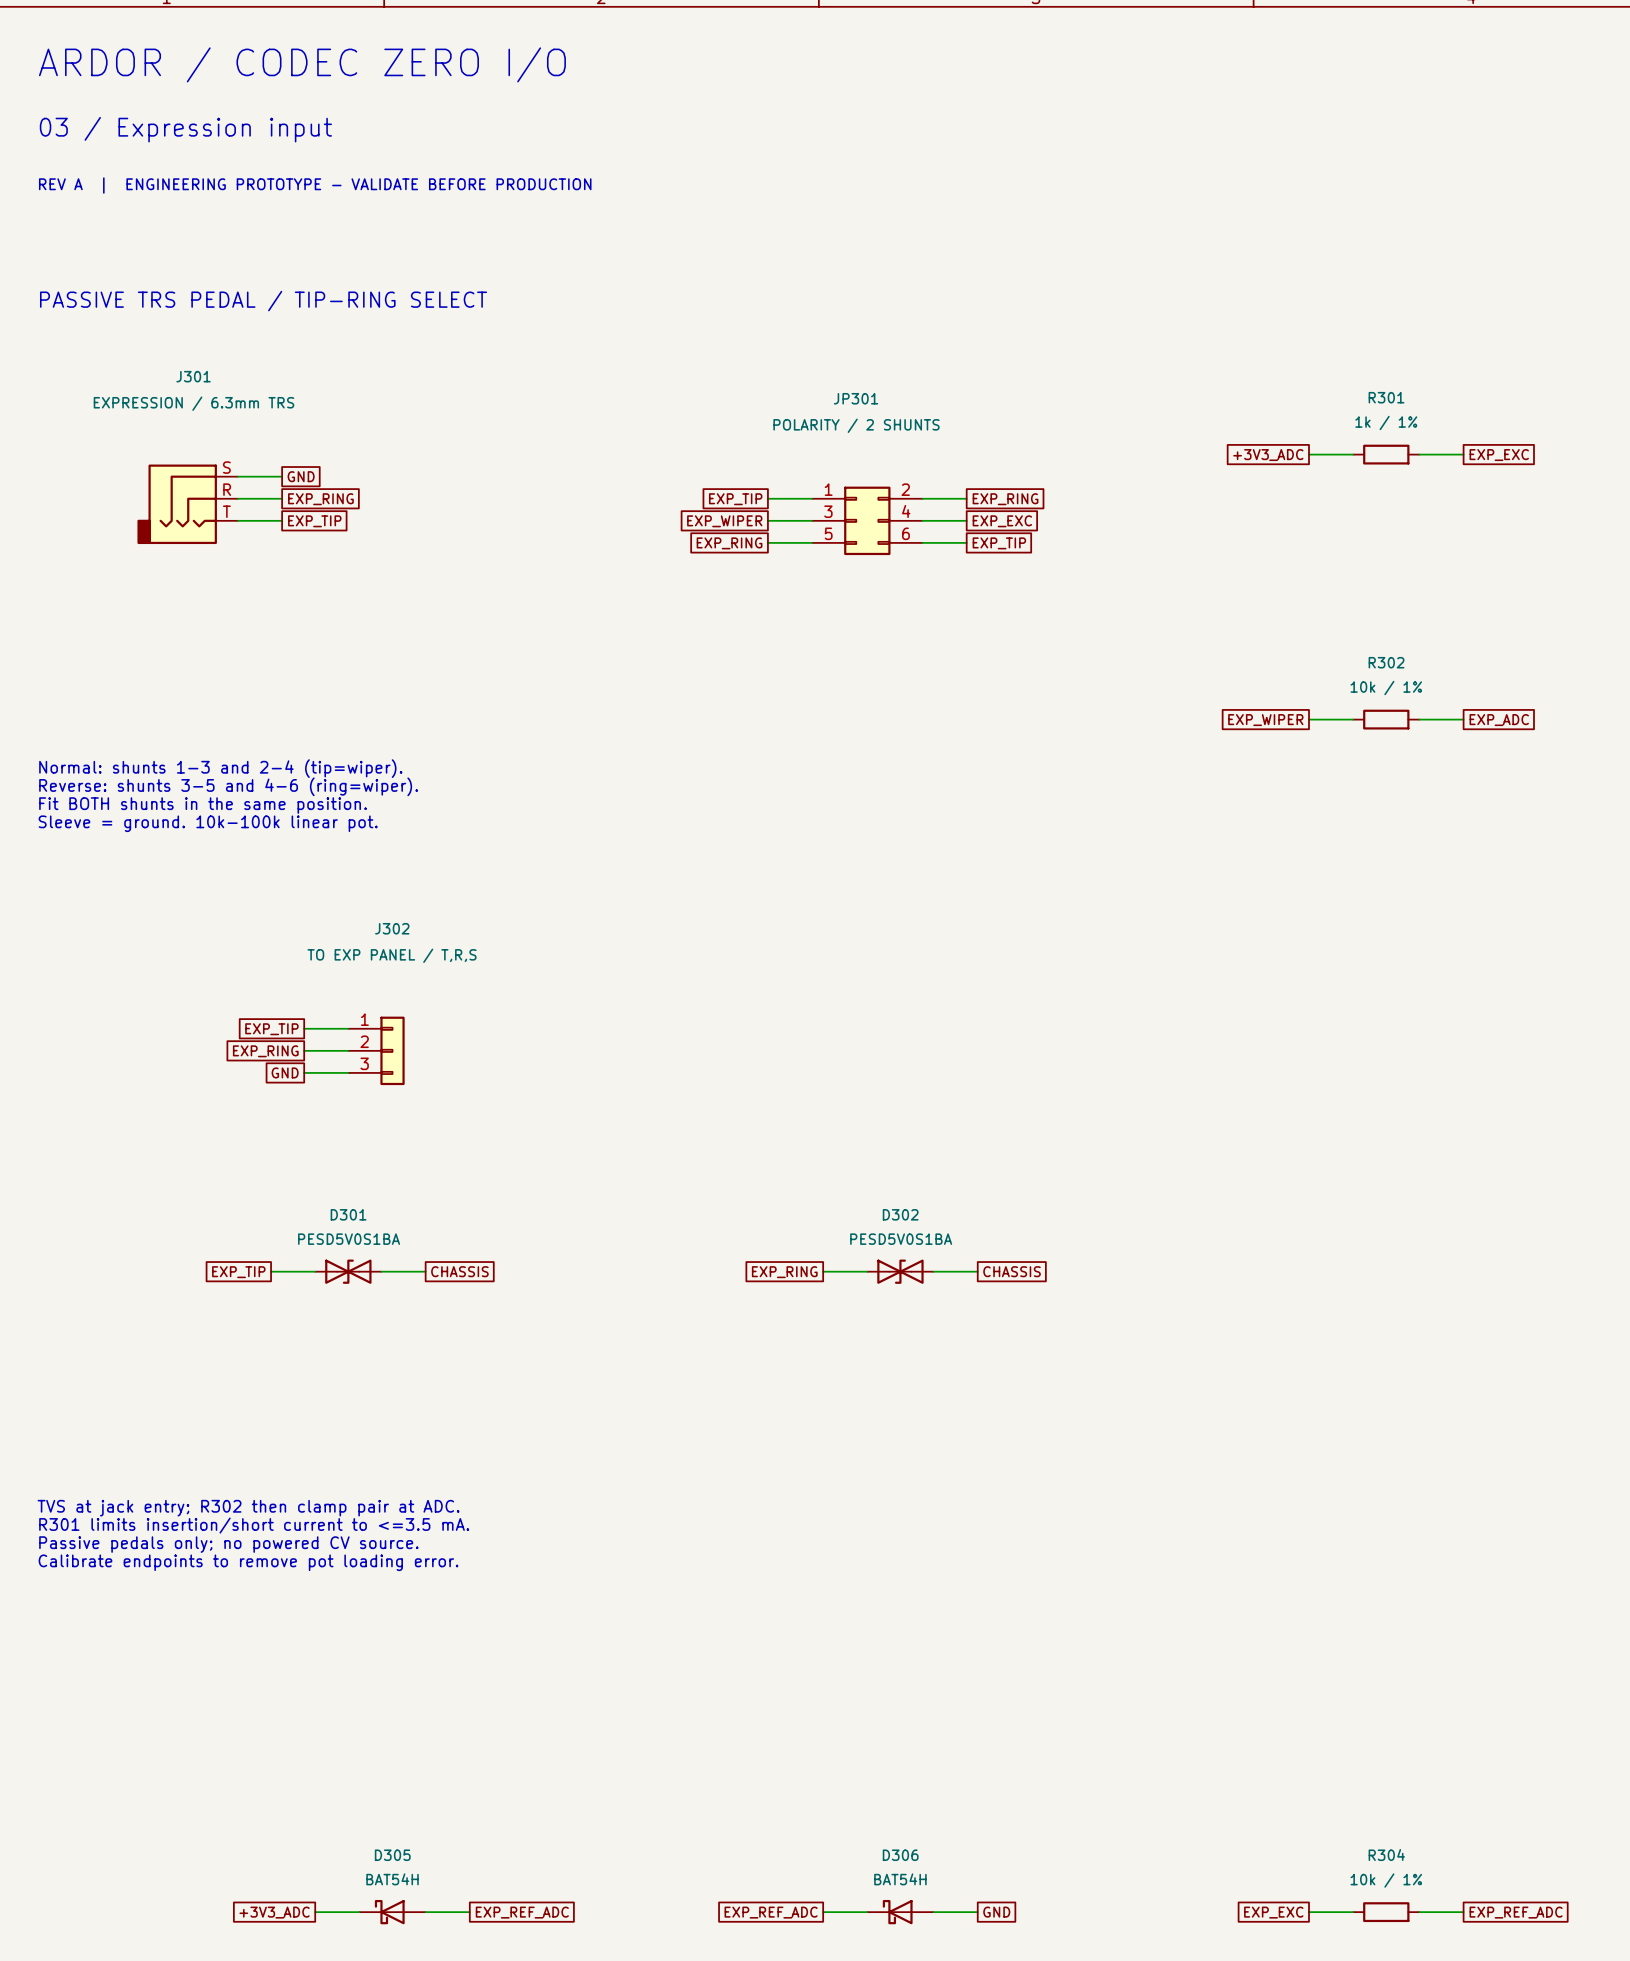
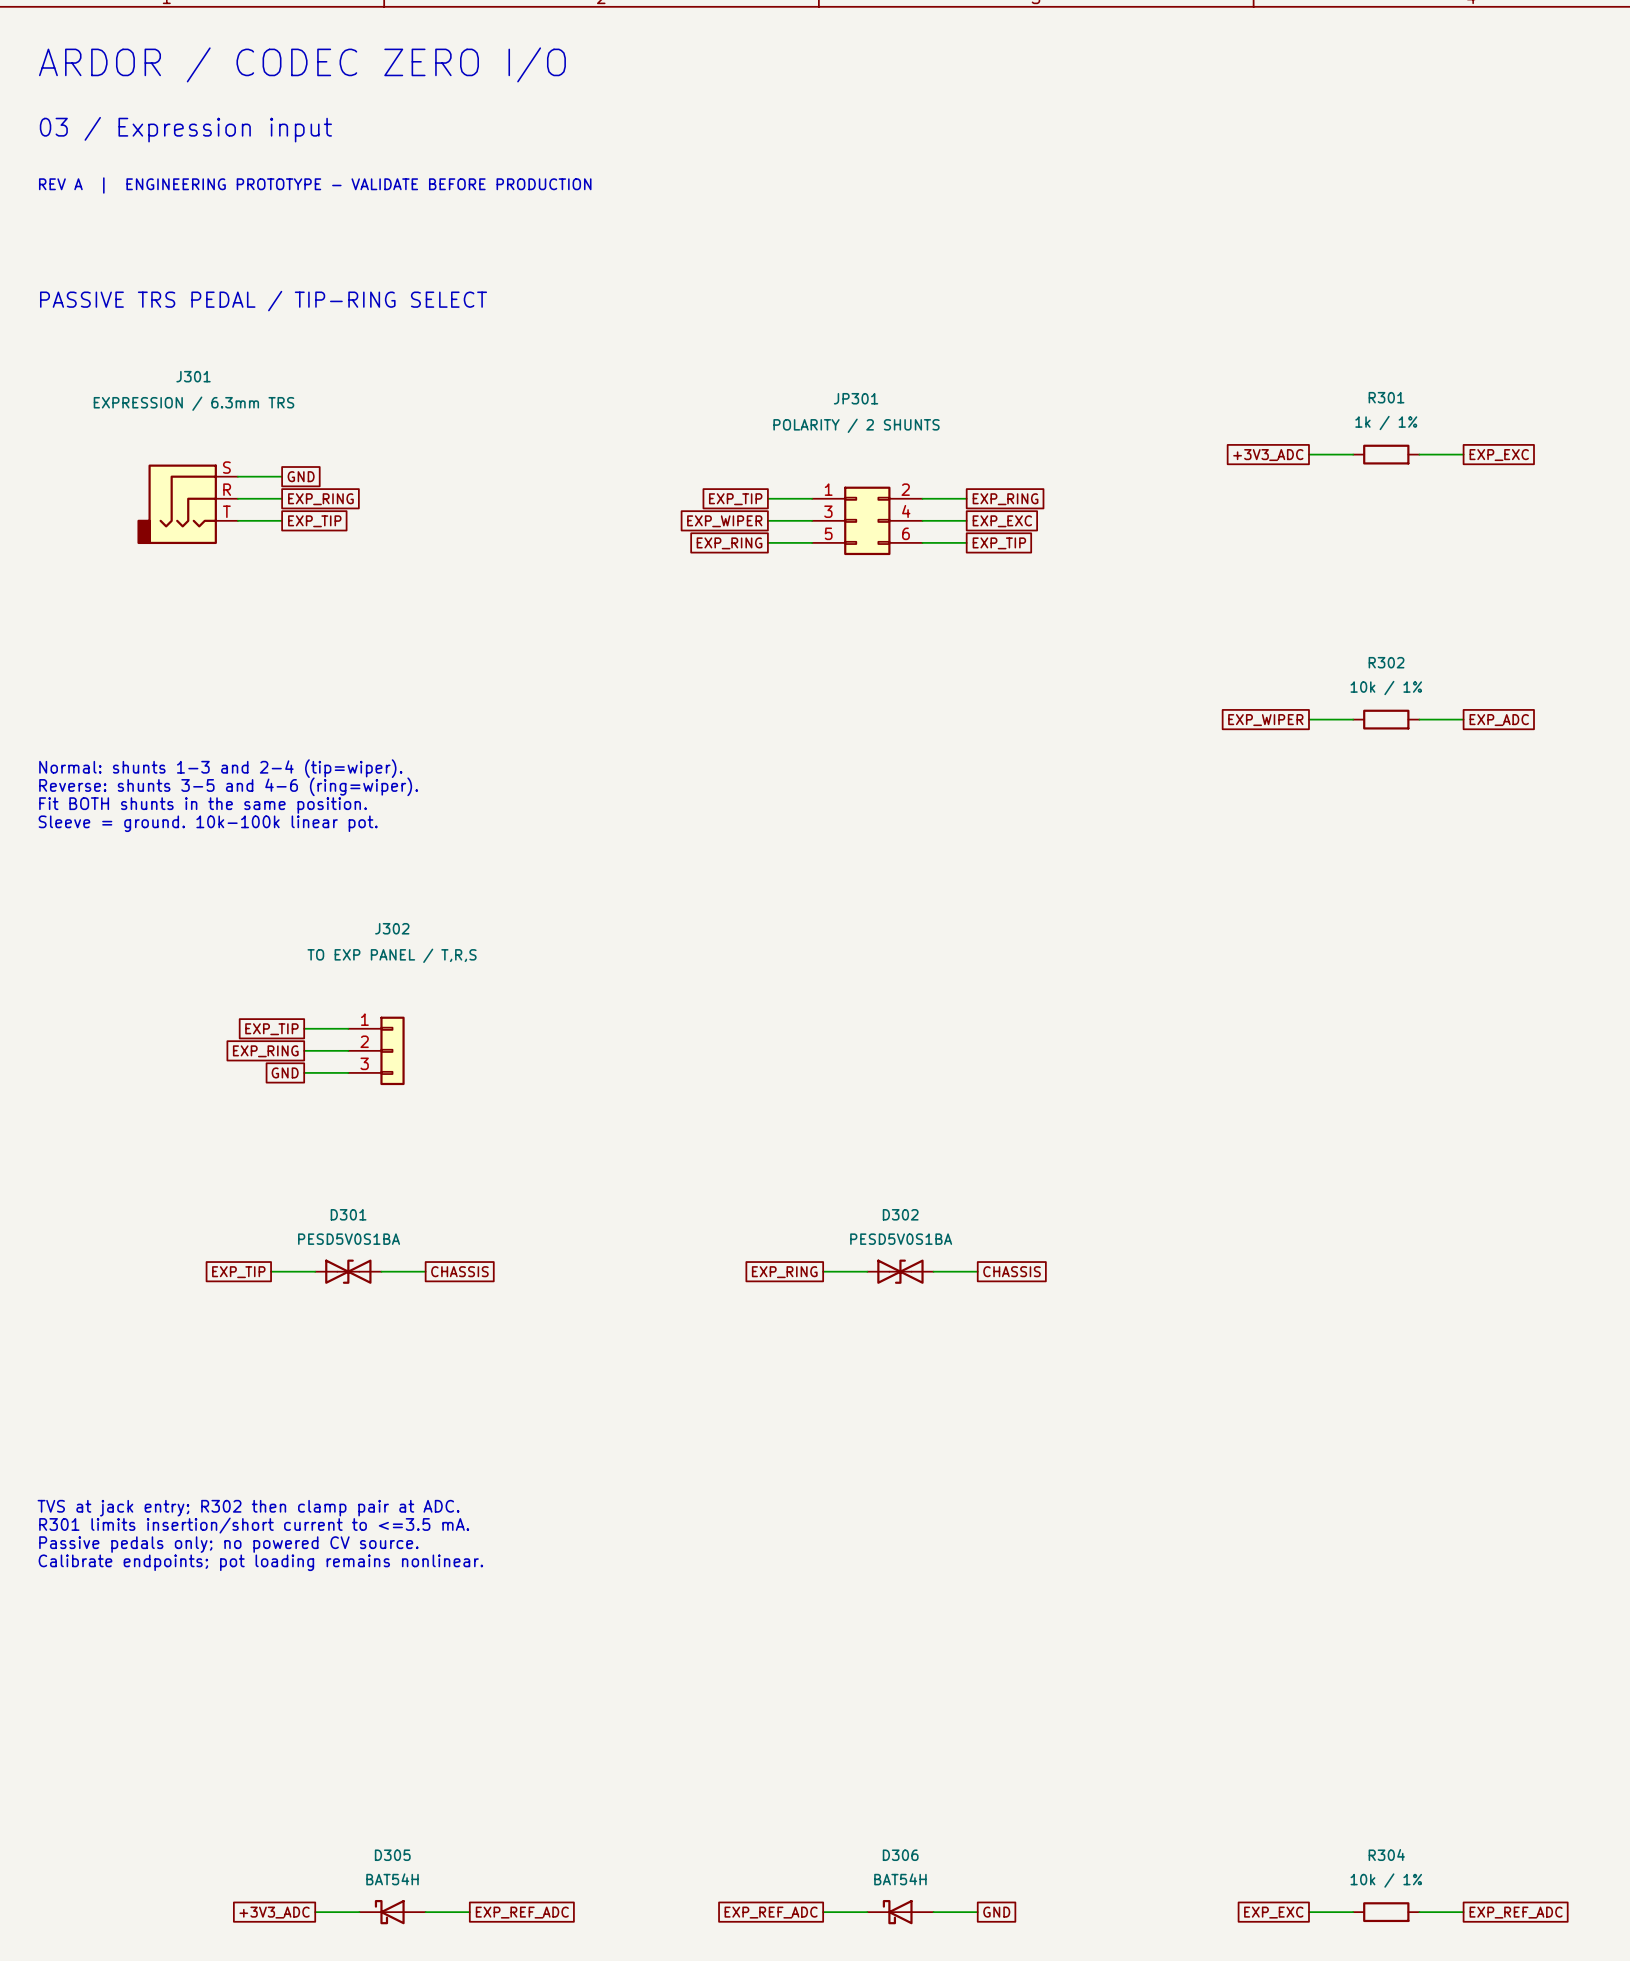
text: Calibrate endpoints to remove pot loading error. (248, 1562) -> Calibrate endpoints; pot loading remains nonlinear. (260, 1562)

